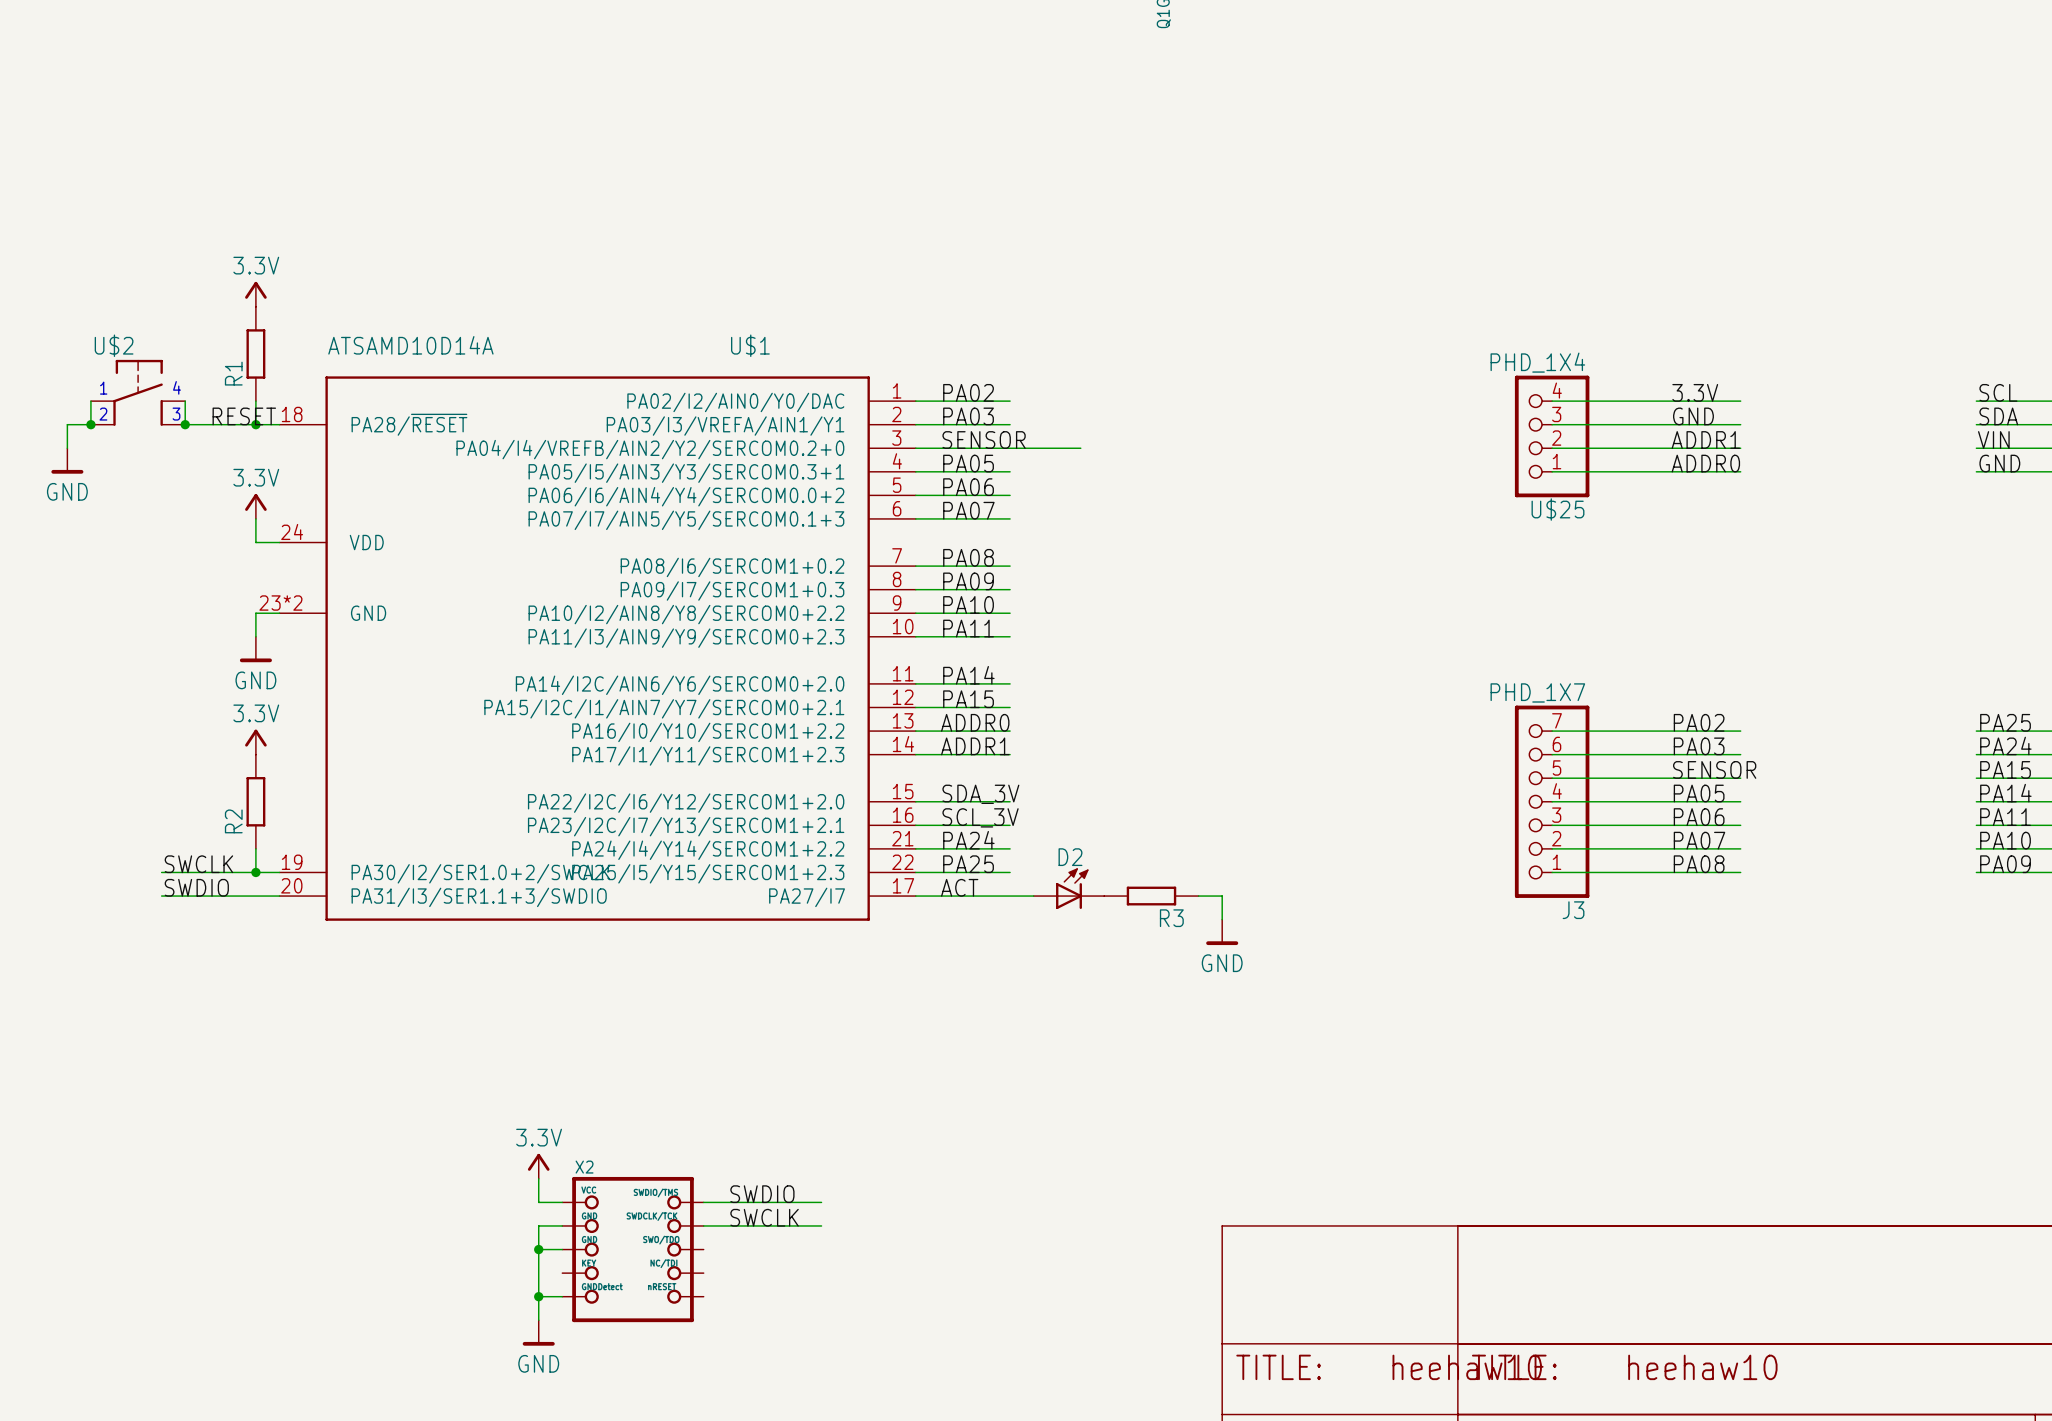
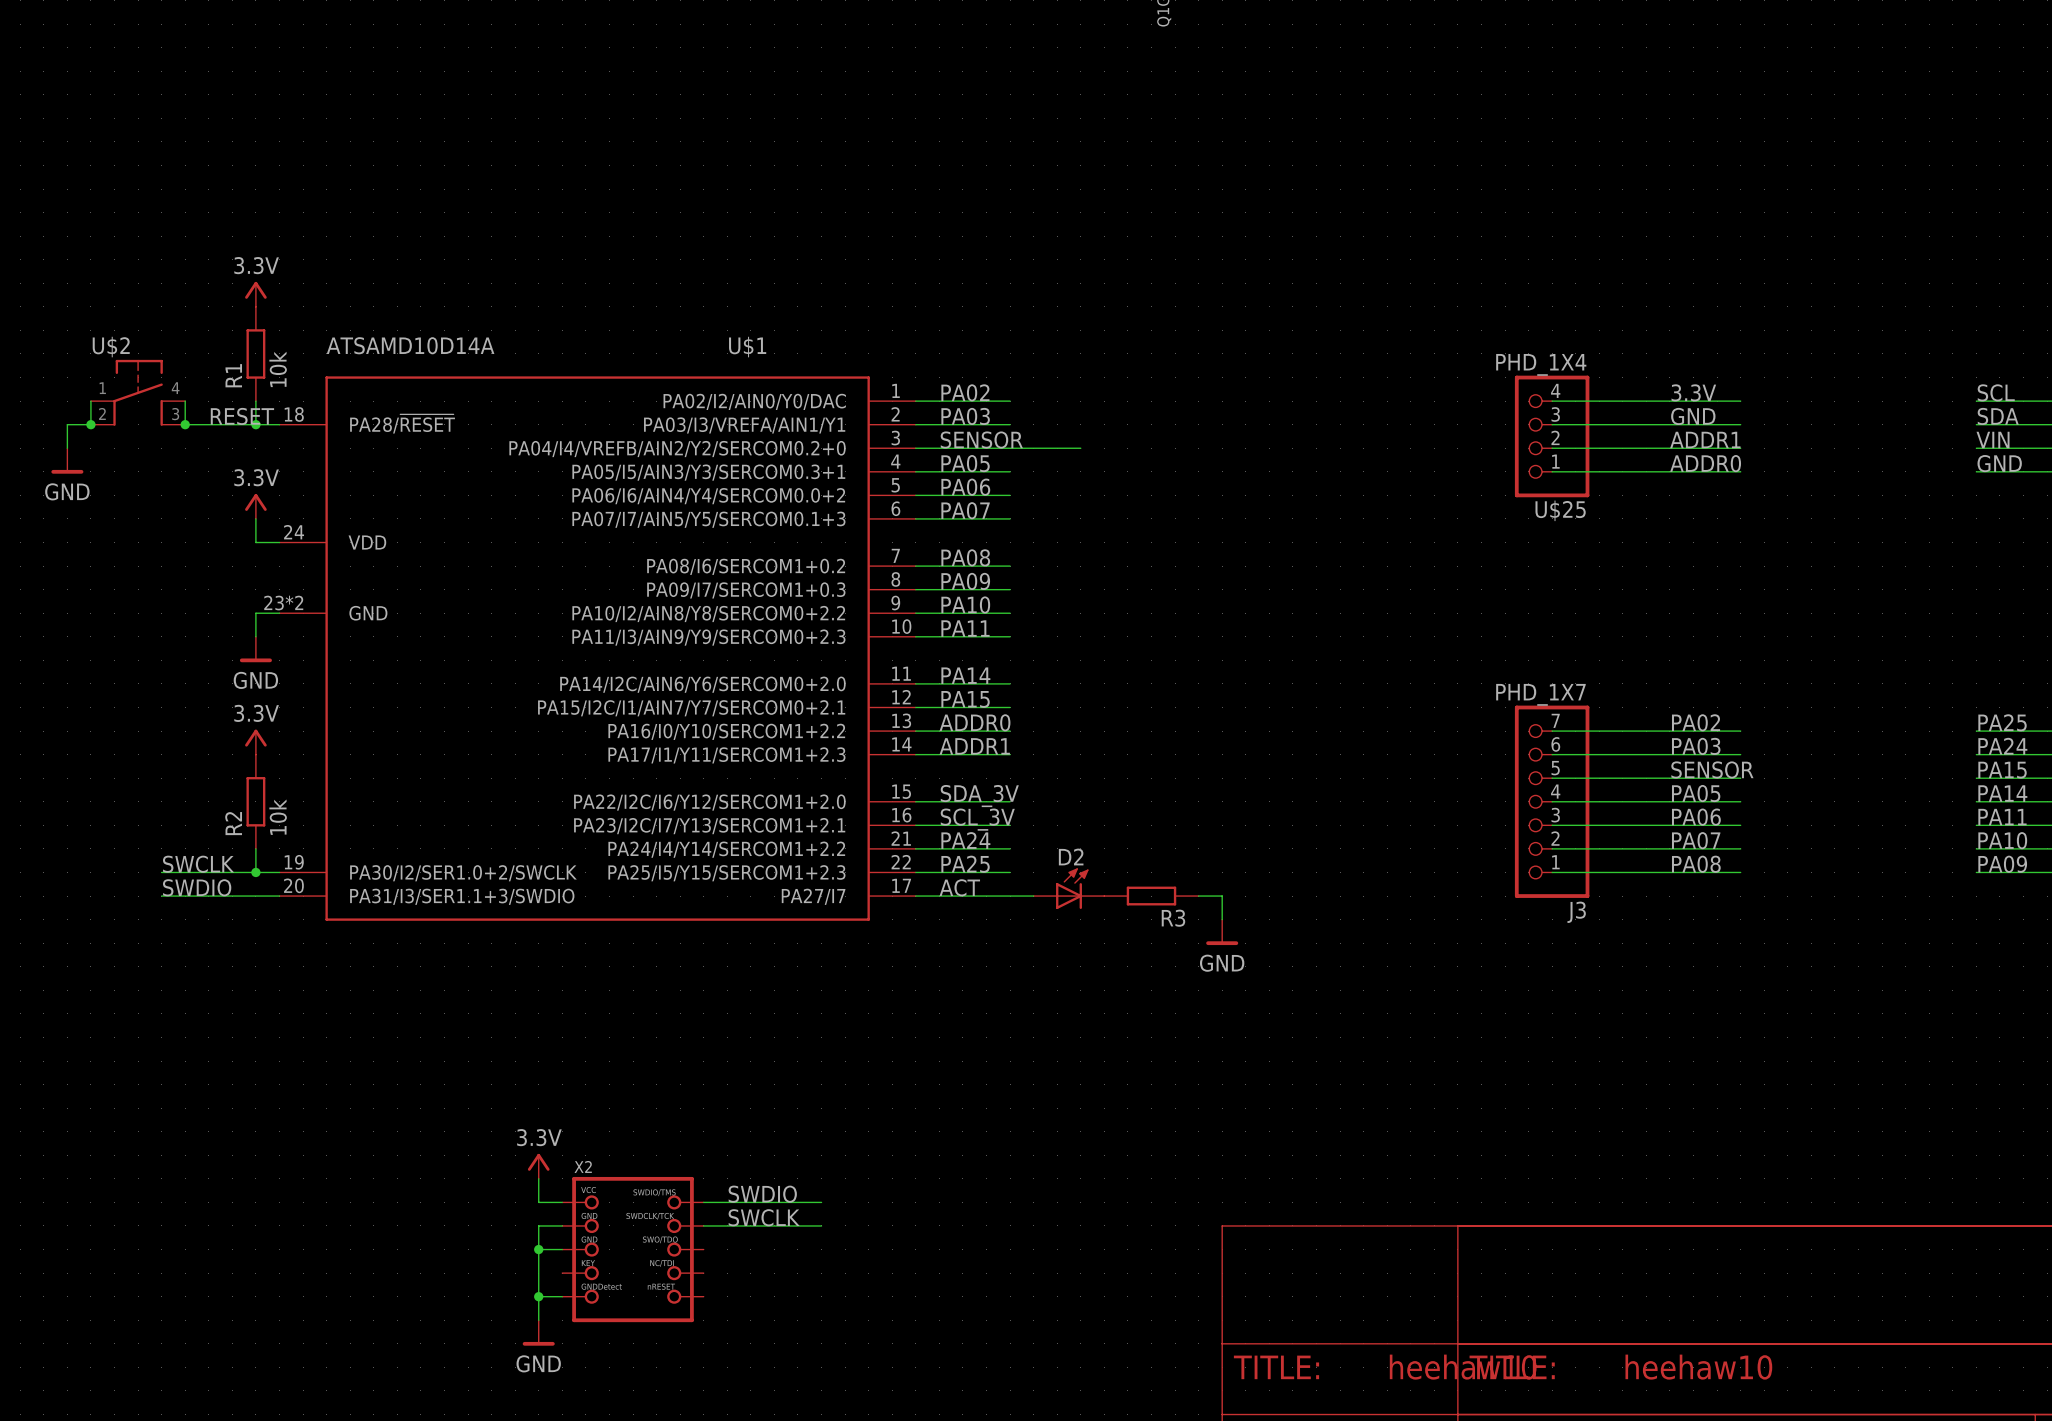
R1 value: none -> 10k (278, 369)
R2 value: none -> 10k (278, 817)

